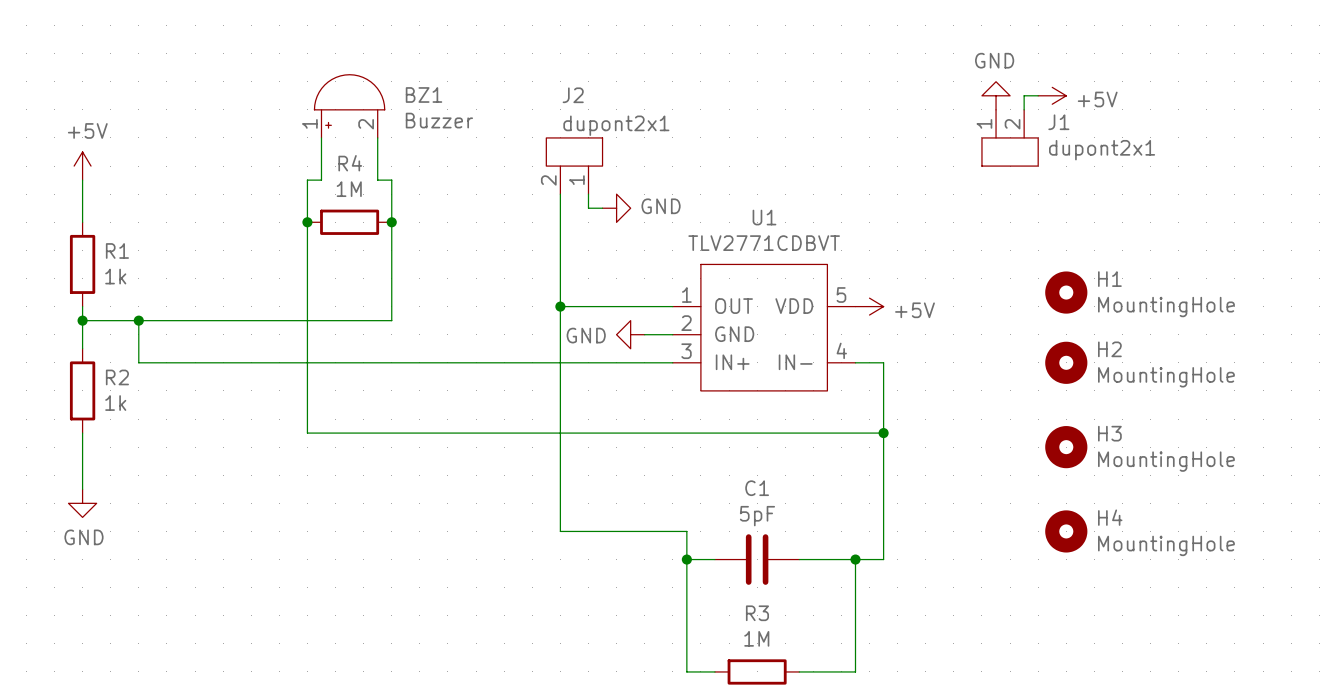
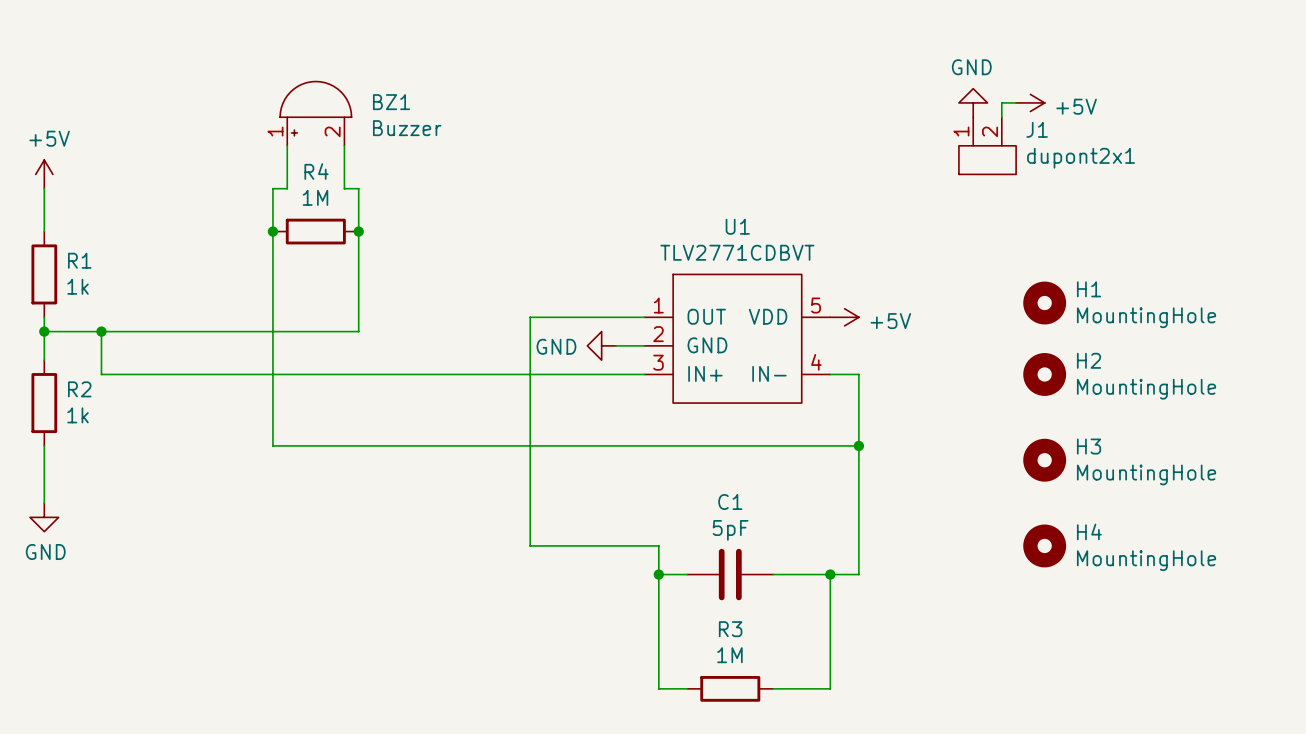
J2: dupont2x1 (574, 166) -> none
wire: (560, 194) (560, 306) -> none
wire: (588, 194) (588, 208) (602, 208) -> none
power symbol: GND (616, 208) -> none
junction: (560, 306) -> none

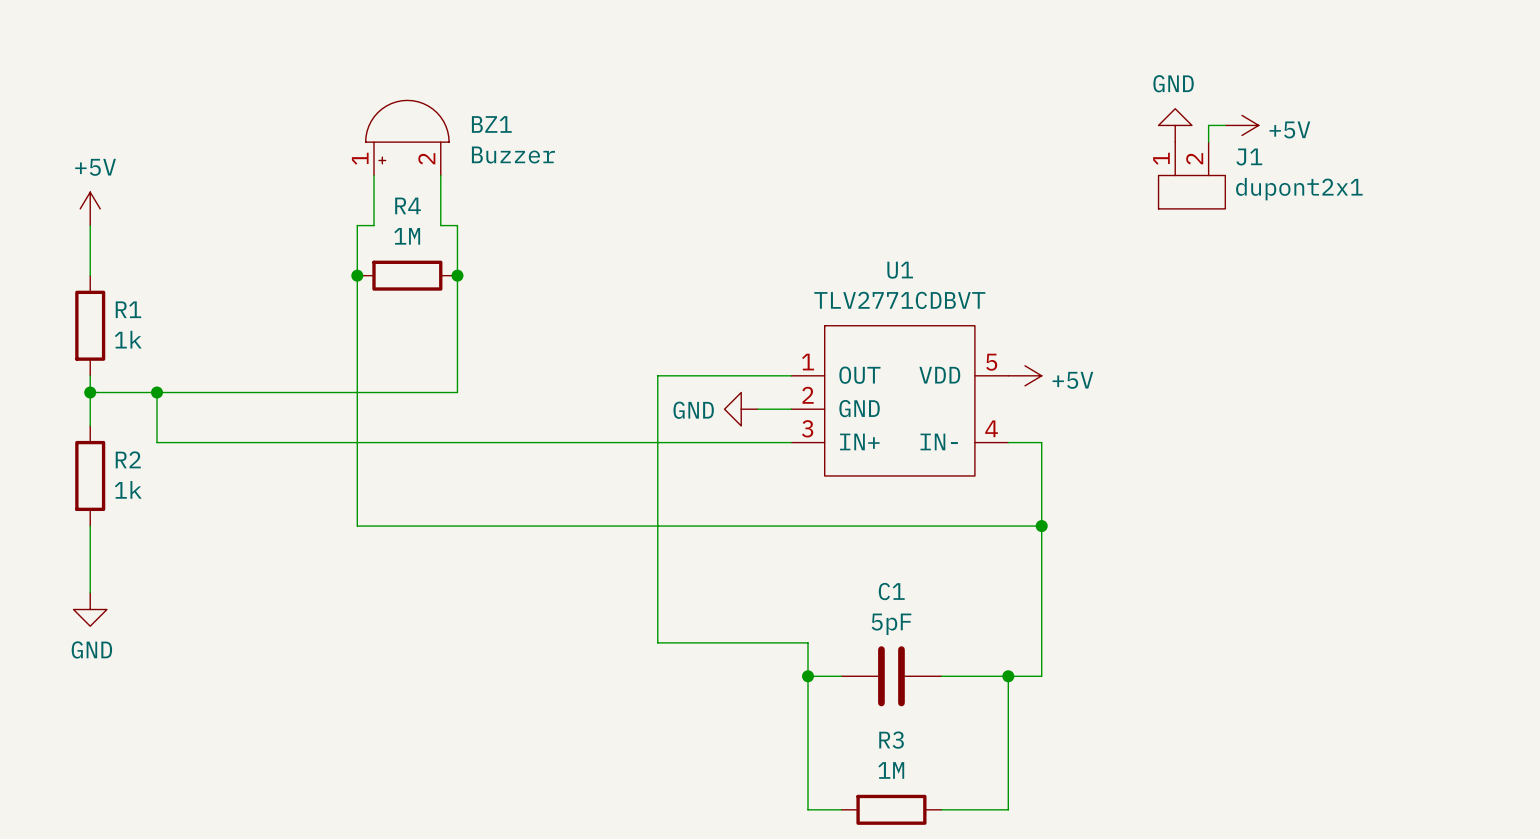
H1: MountingHole (1044, 303) -> none
H2: MountingHole (1044, 374) -> none
H3: MountingHole (1044, 460) -> none
H4: MountingHole (1044, 545) -> none

